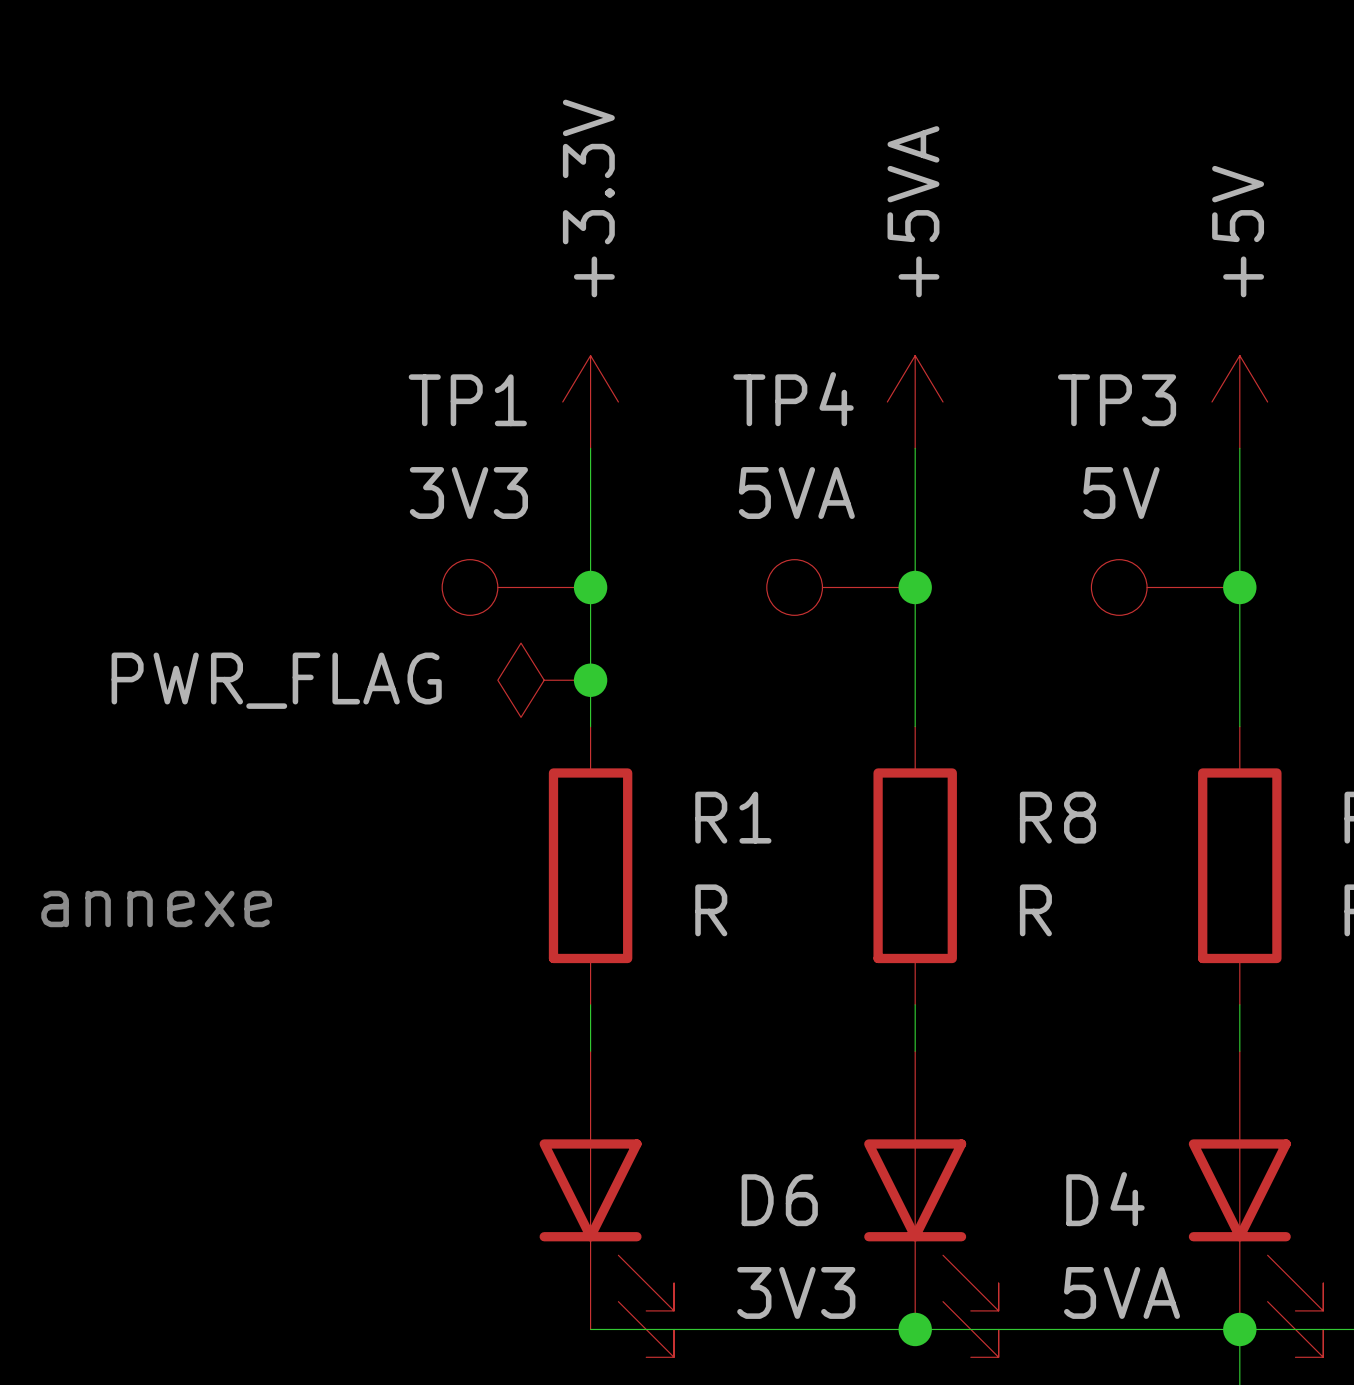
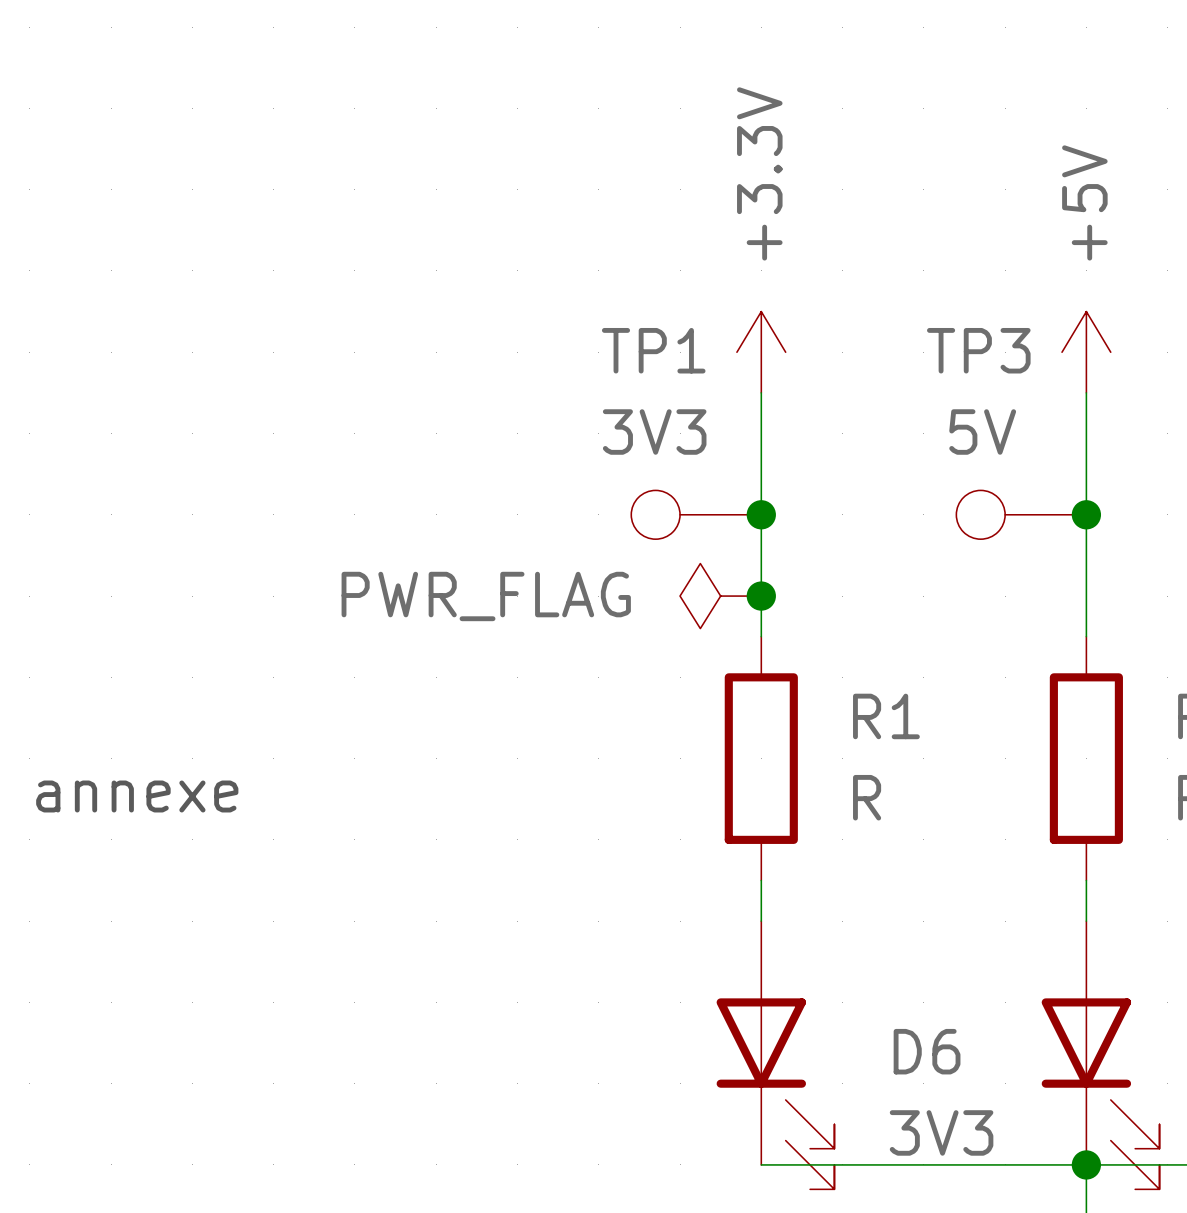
power symbol position: +3.3V (590, 402) -> +3.3V (761, 352)
power symbol: +5VA (915, 402) -> none
wire: (590, 448) (590, 726) -> none
wire: (915, 448) (915, 726) -> (761, 392) (761, 636)
TP1 position: (516, 587) -> (696, 514)
junction: (590, 587) -> none
TP4: 5VA (840, 587) -> none
junction position: (915, 587) -> (761, 514)
power symbol position: PWR_FLAG (544, 680) -> PWR_FLAG (720, 596)
junction: (590, 680) -> none
junction: none -> (761, 596)
R1 position: (590, 865) -> (761, 758)
R8: R (915, 865) -> none
wire: (590, 1004) (590, 1051) -> none
wire: (915, 1004) (915, 1051) -> (761, 880) (761, 921)
D6 position: (606, 1204) -> (775, 1055)
D4: 5VA (931, 1204) -> none
wire: (590, 1329) (868, 1329) -> none
junction: (915, 1329) -> none

